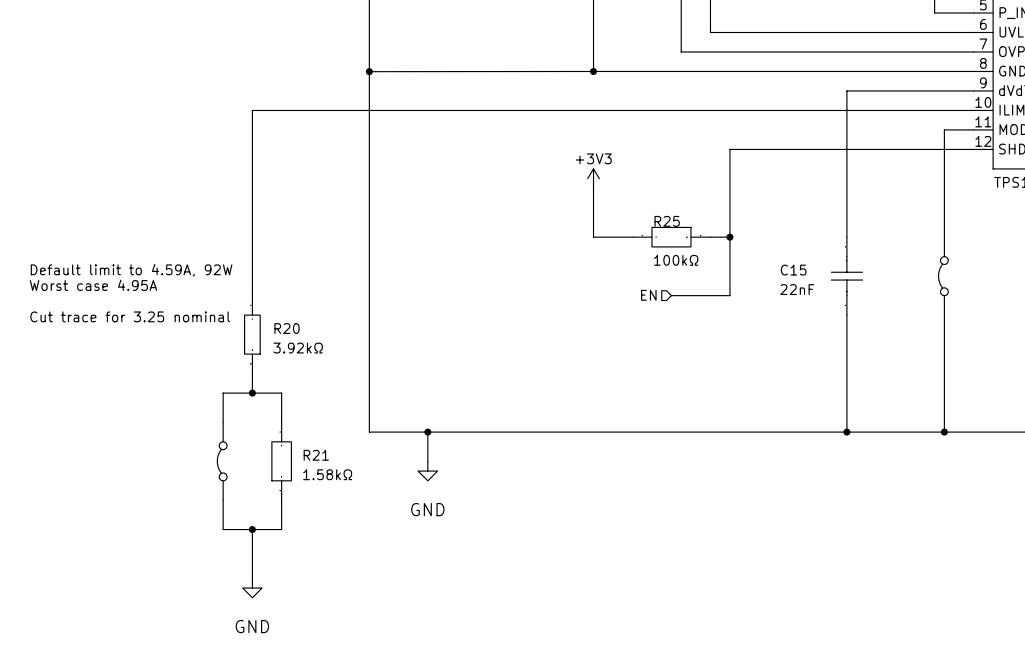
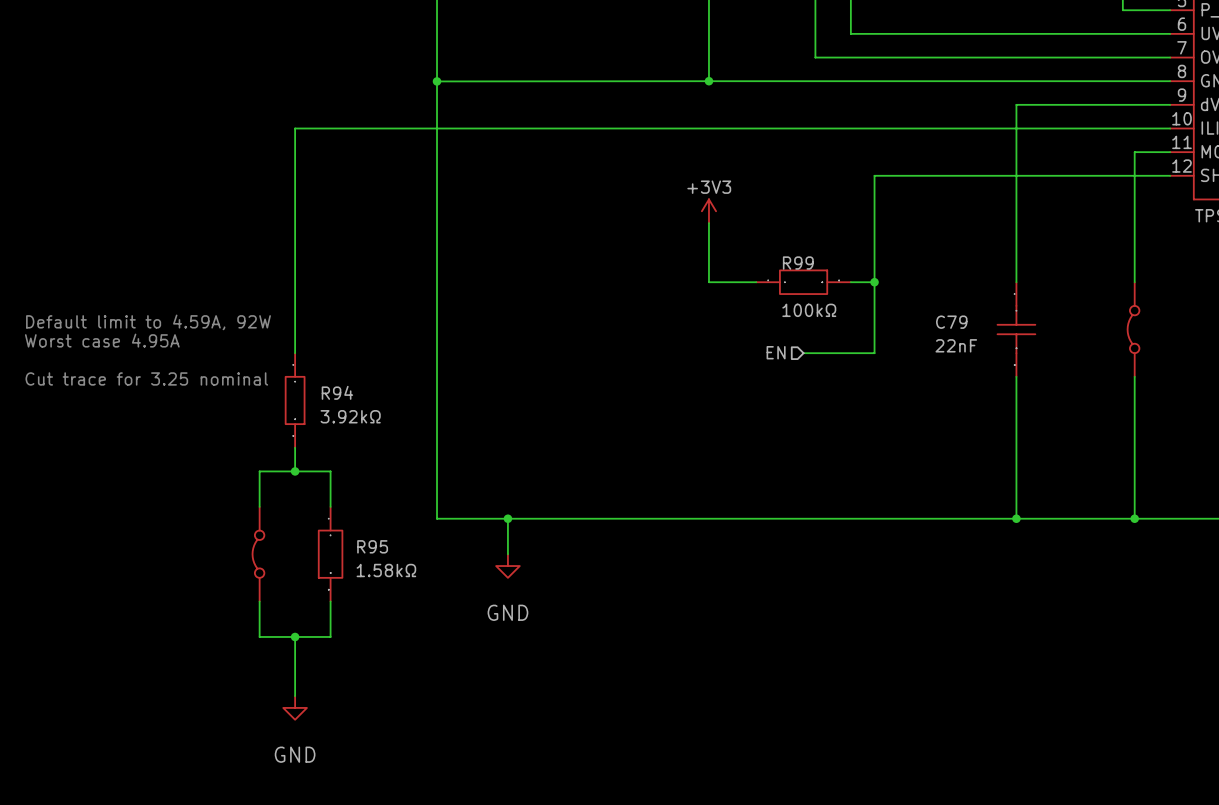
R25 name: R25 (667, 221) -> R99 (798, 263)
C15 name: C15 (793, 270) -> C79 (951, 322)
R20 name: R20 (287, 328) -> R94 (337, 392)
R21 name: R21 (316, 455) -> R95 (372, 546)

